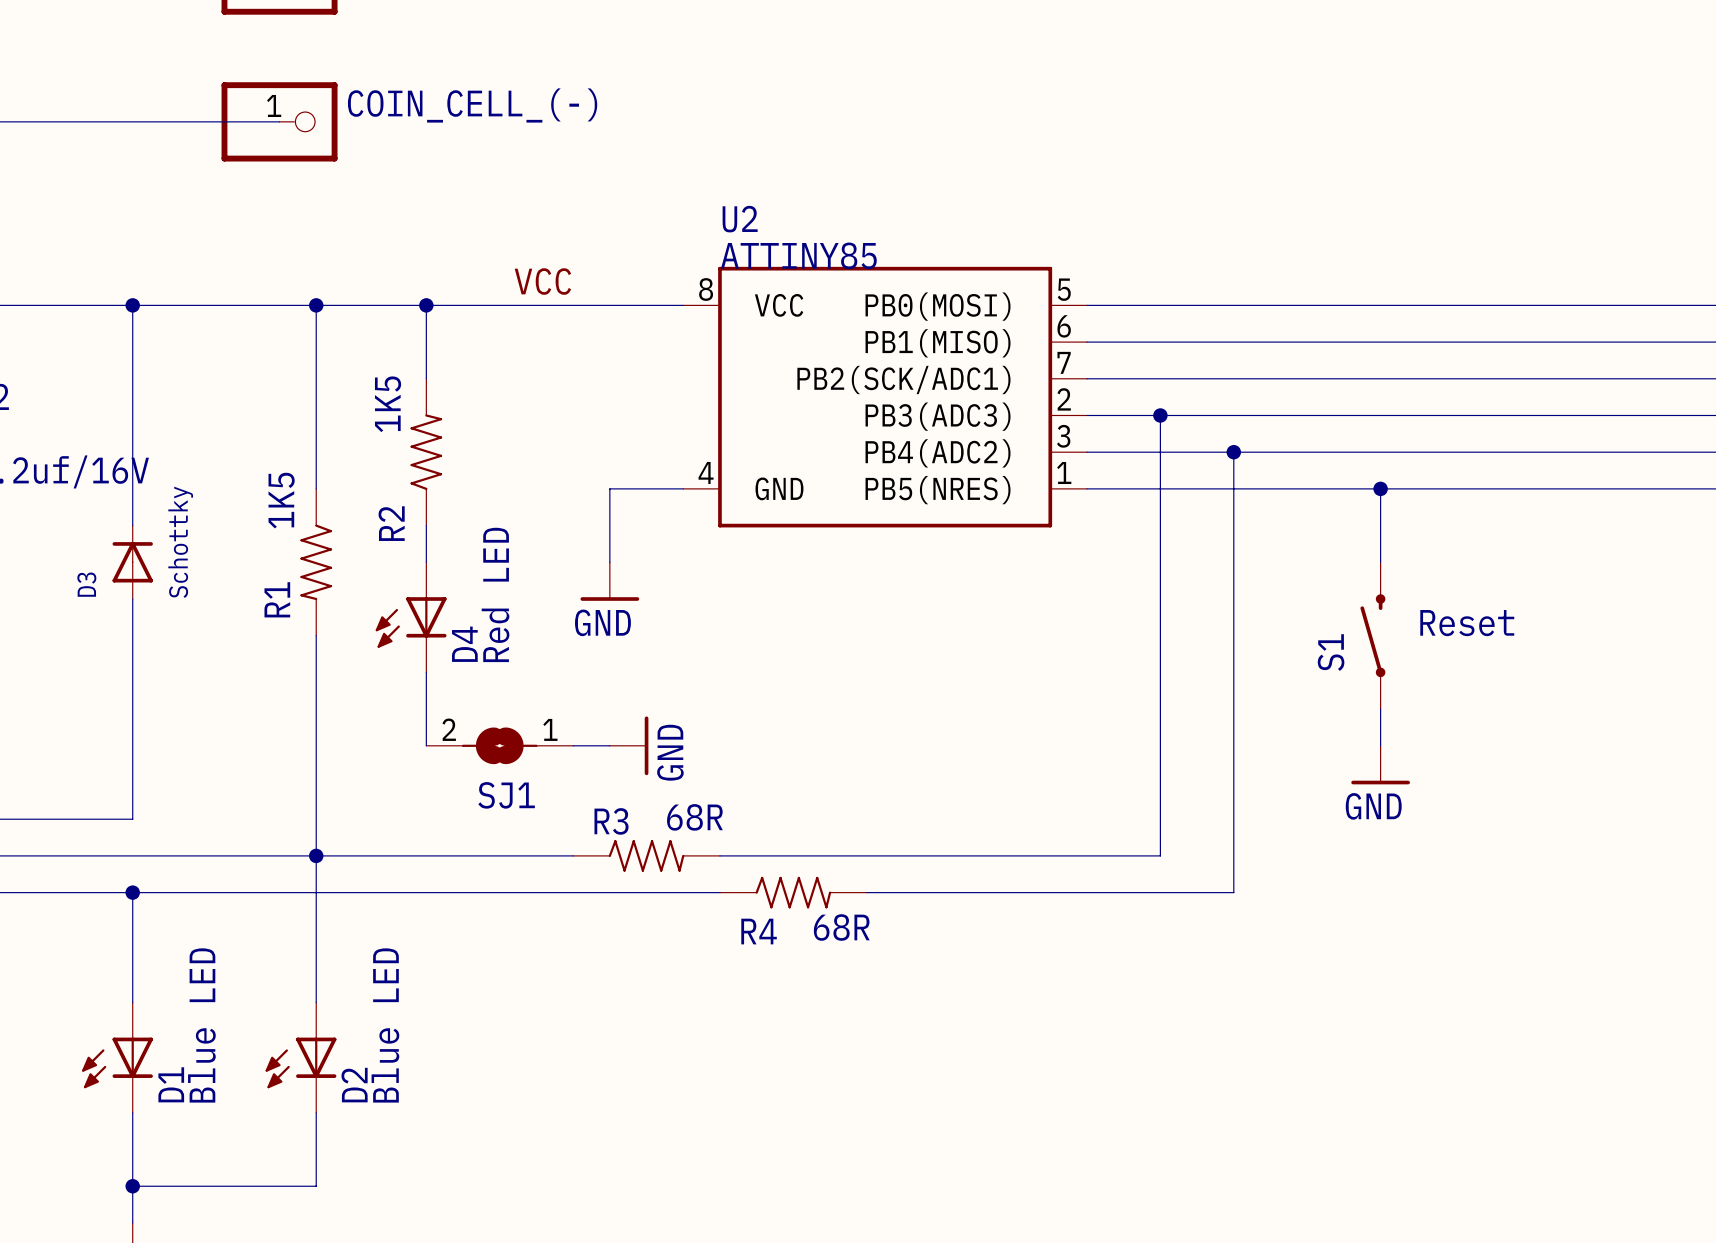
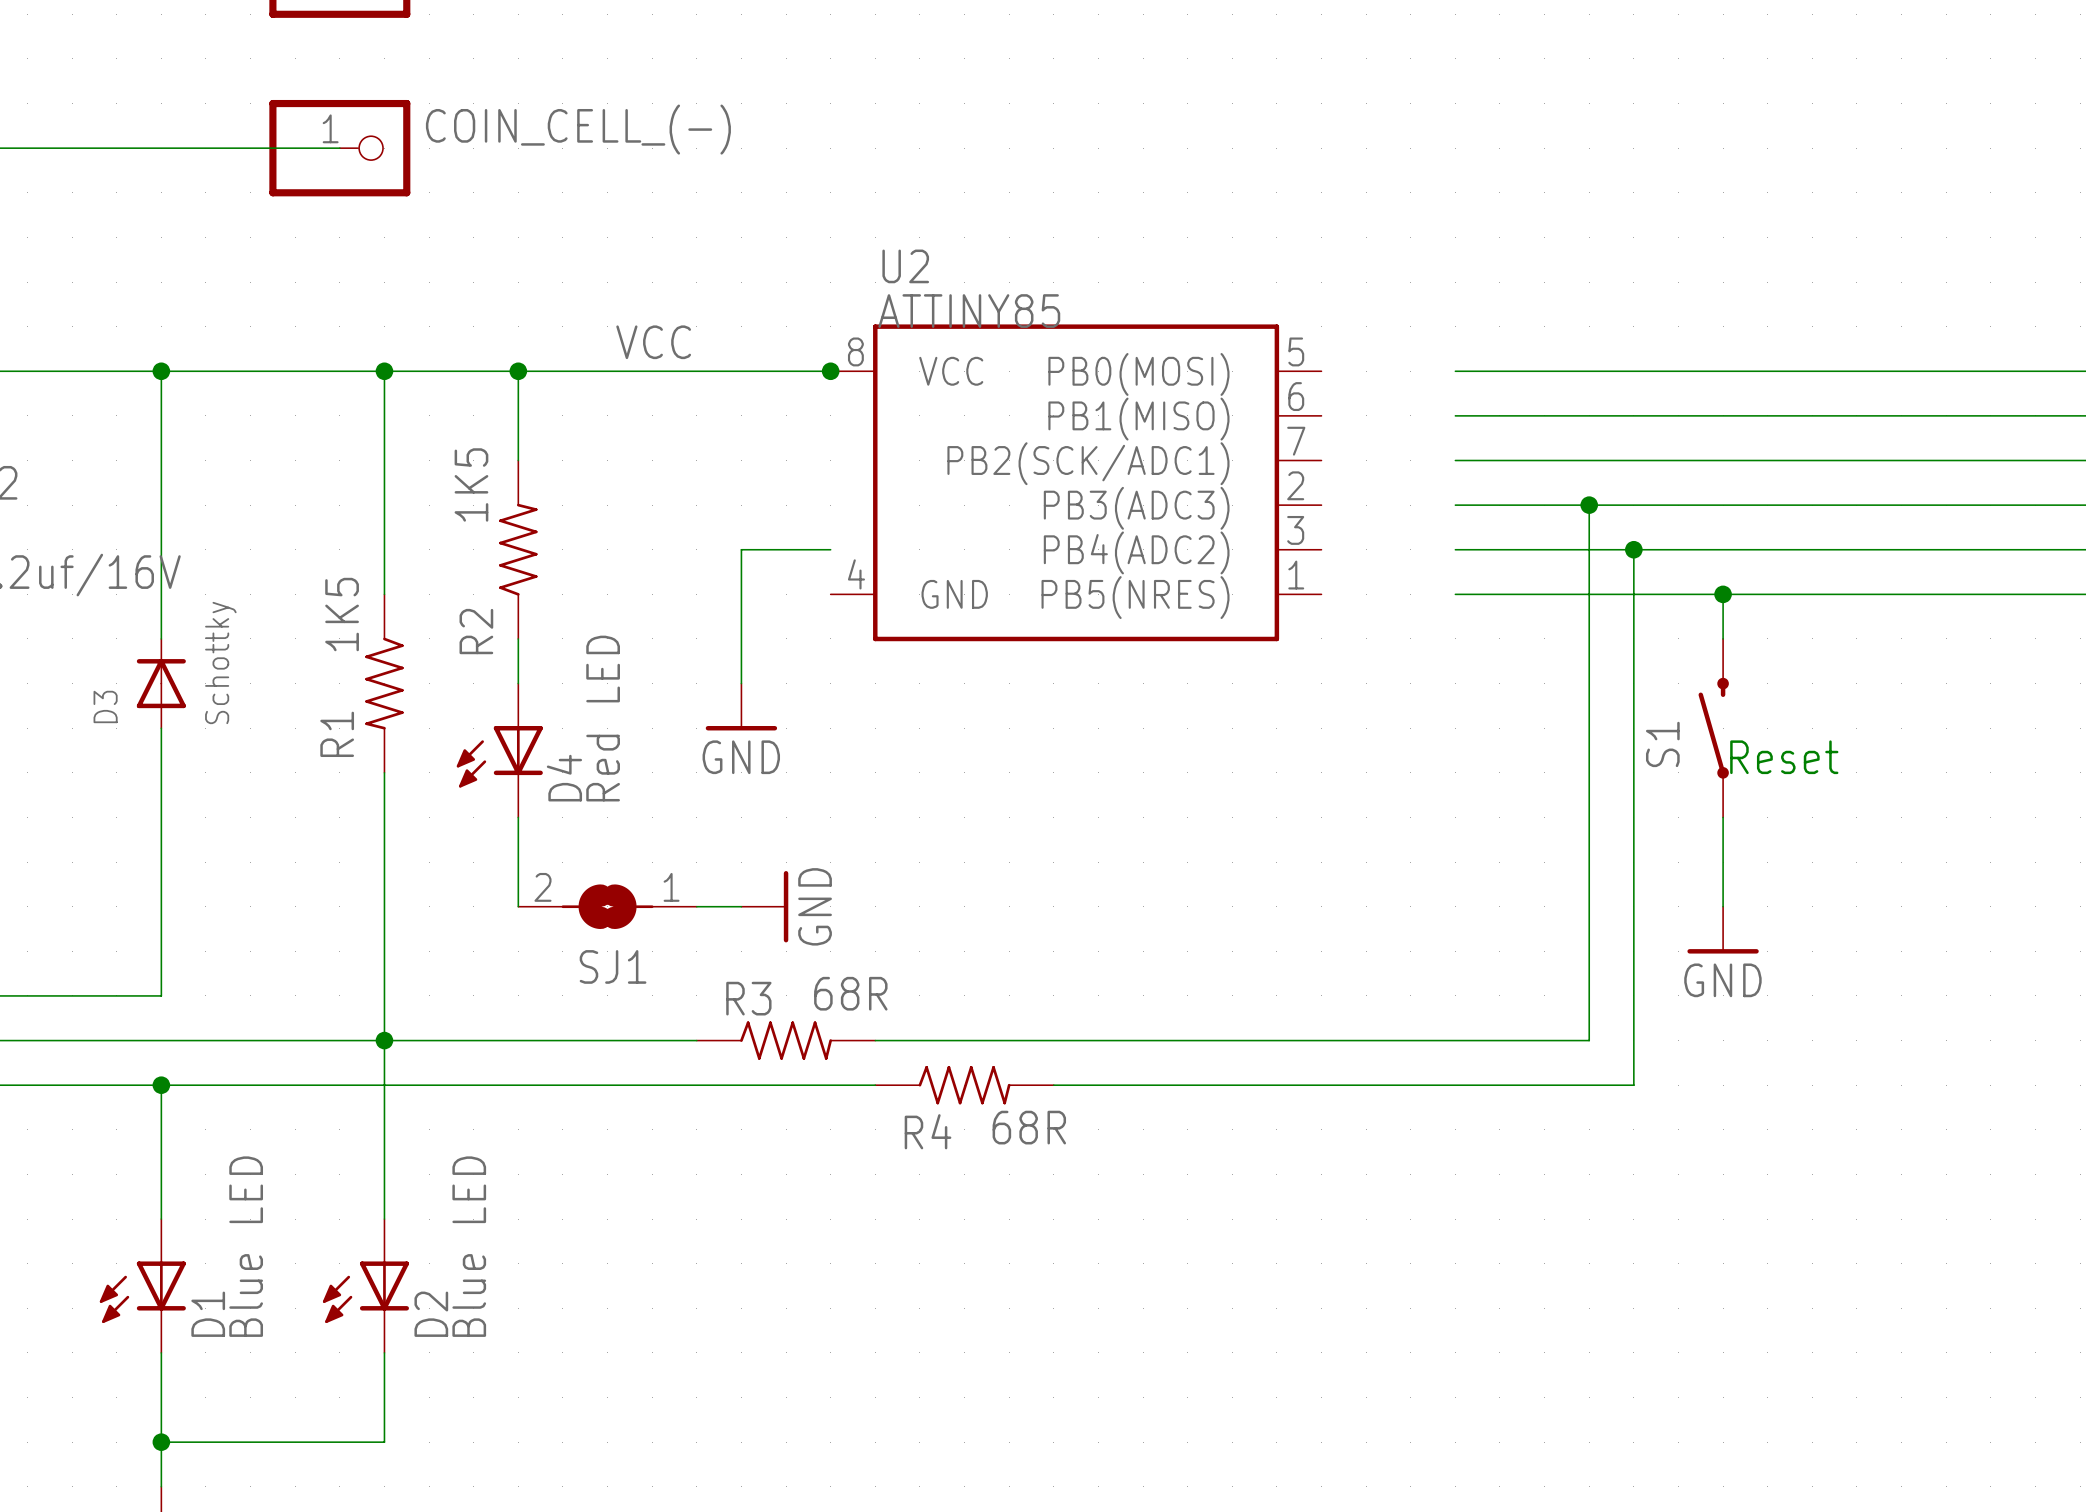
junction: none -> (830, 371)
wire: (1086, 305) (1197, 305) -> none
wire: (1086, 342) (1197, 342) -> none
wire: (1086, 378) (1197, 378) -> none
wire: (1086, 415) (1197, 415) -> none
wire: (1160, 415) (1160, 855) -> (1589, 505) (1589, 1040) (1410, 1040)
junction: (1160, 415) -> none
junction: none -> (1589, 505)
wire: (1086, 452) (1197, 452) -> none
wire: (1233, 452) (1233, 892) -> (1633, 549) (1633, 1085) (1499, 1085)
junction: (1233, 452) -> none
junction: none -> (1633, 549)
wire: (609, 488) (683, 488) -> (741, 594) (741, 549) (830, 549)
wire: (1086, 488) (1197, 488) -> none
wire: (1380, 488) (1380, 562) -> (1723, 817) (1723, 906)
junction: (1380, 488) -> none
junction: none -> (1723, 594)
S1 position: (1372, 635) -> (1713, 728)
wire: (1380, 709) (1380, 745) -> (1723, 594) (1723, 638)
power symbol position: GND (1380, 765) -> GND (1723, 930)

